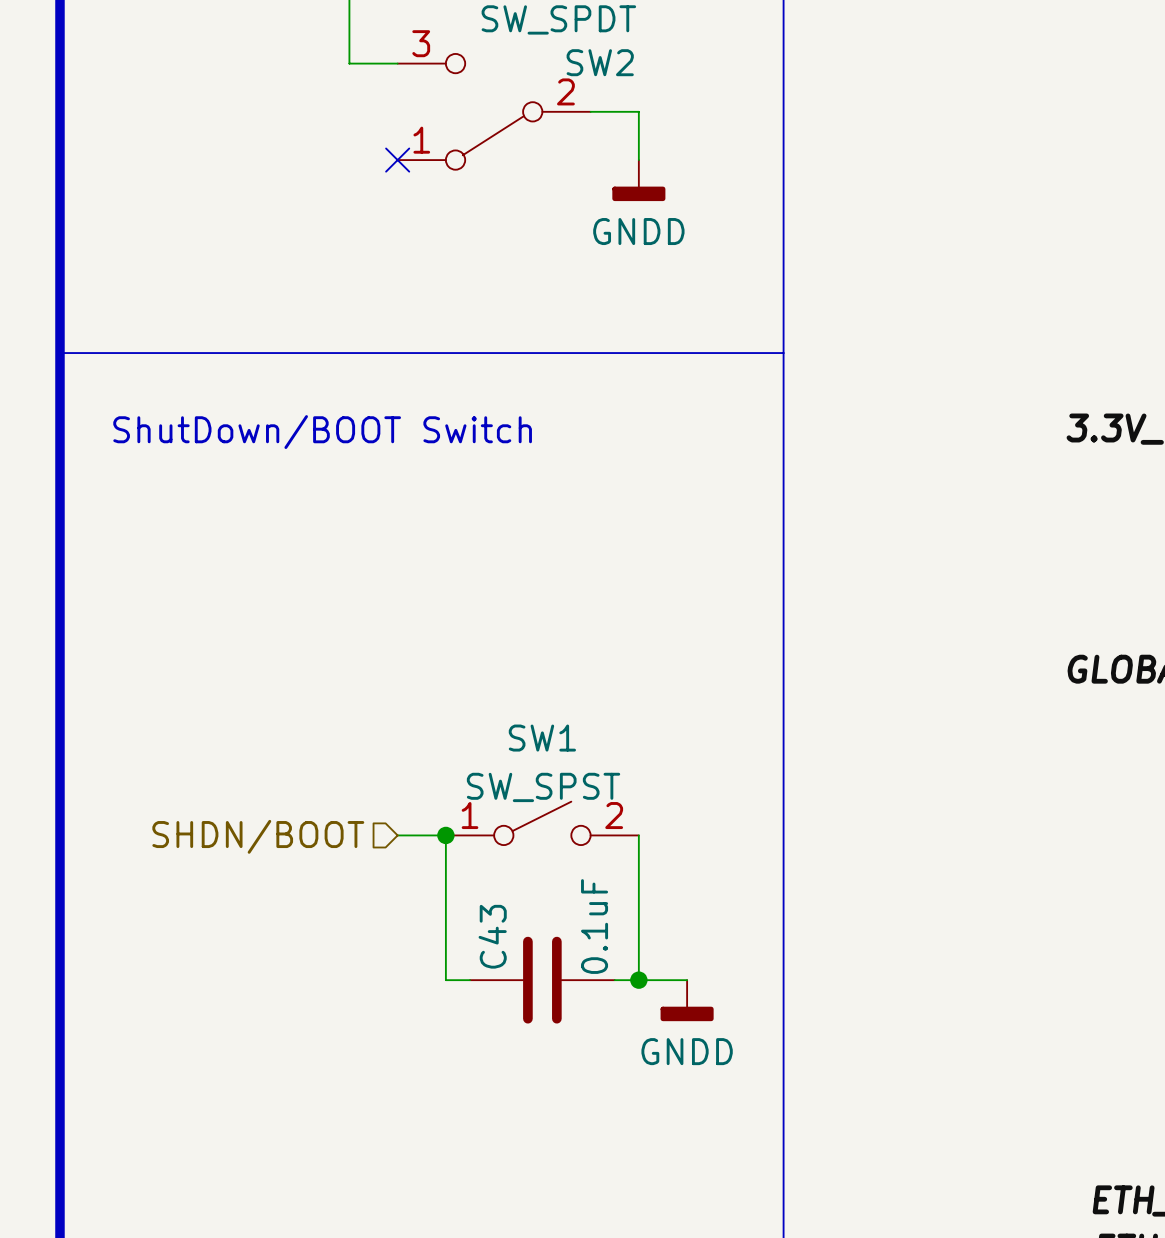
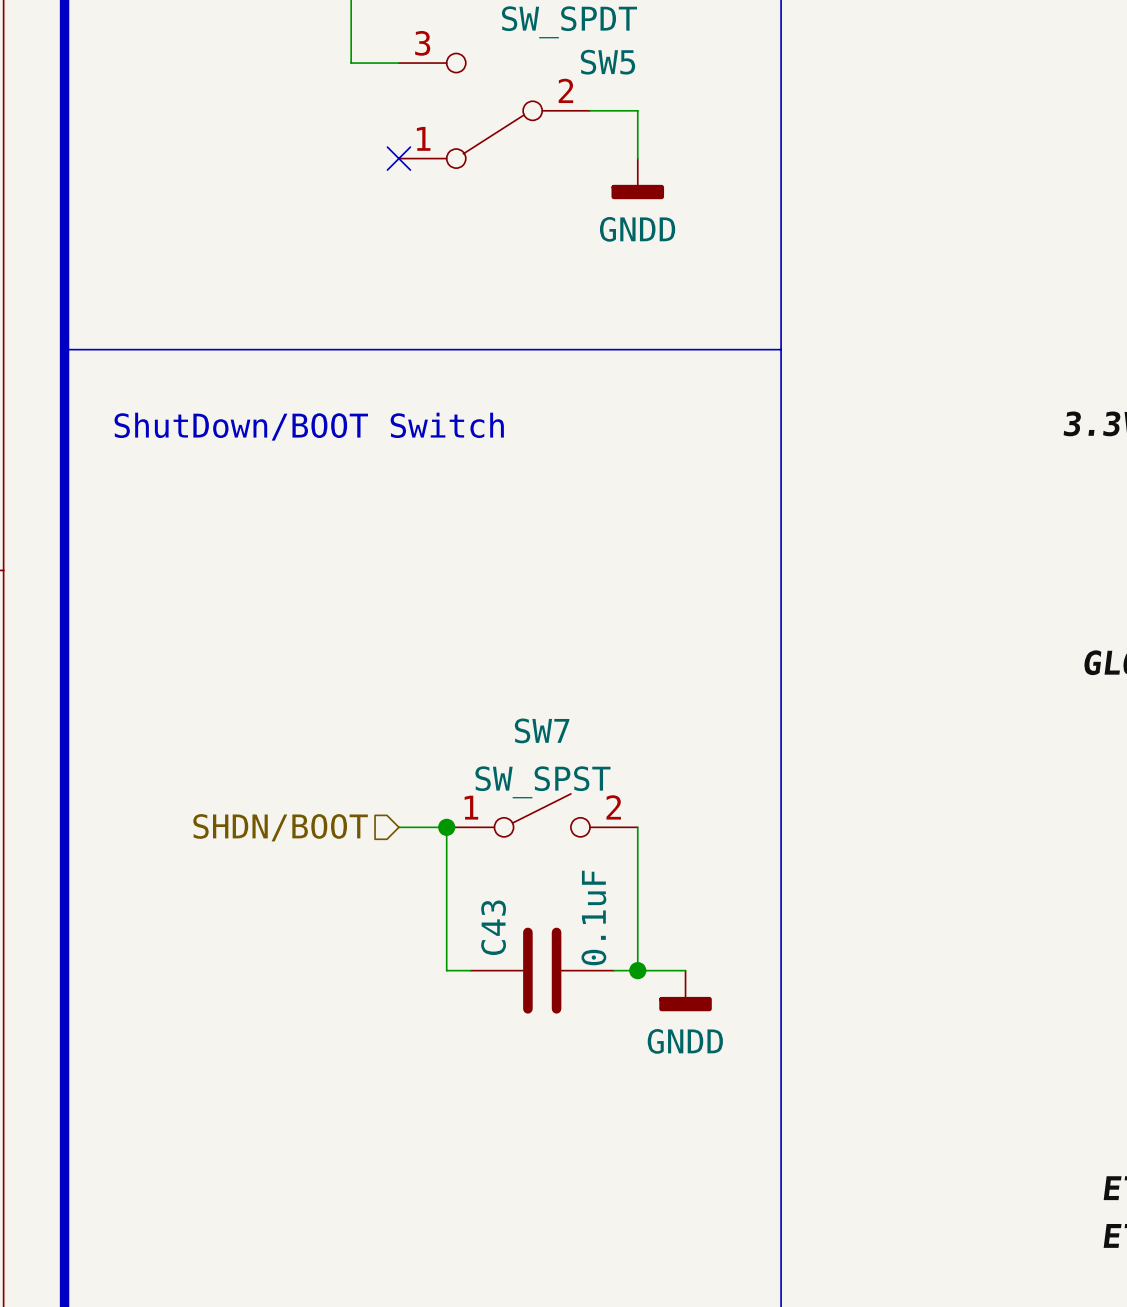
SW2 name: SW2 (600, 62) -> SW5 (607, 62)
SW1 name: SW1 (542, 738) -> SW7 (542, 730)

